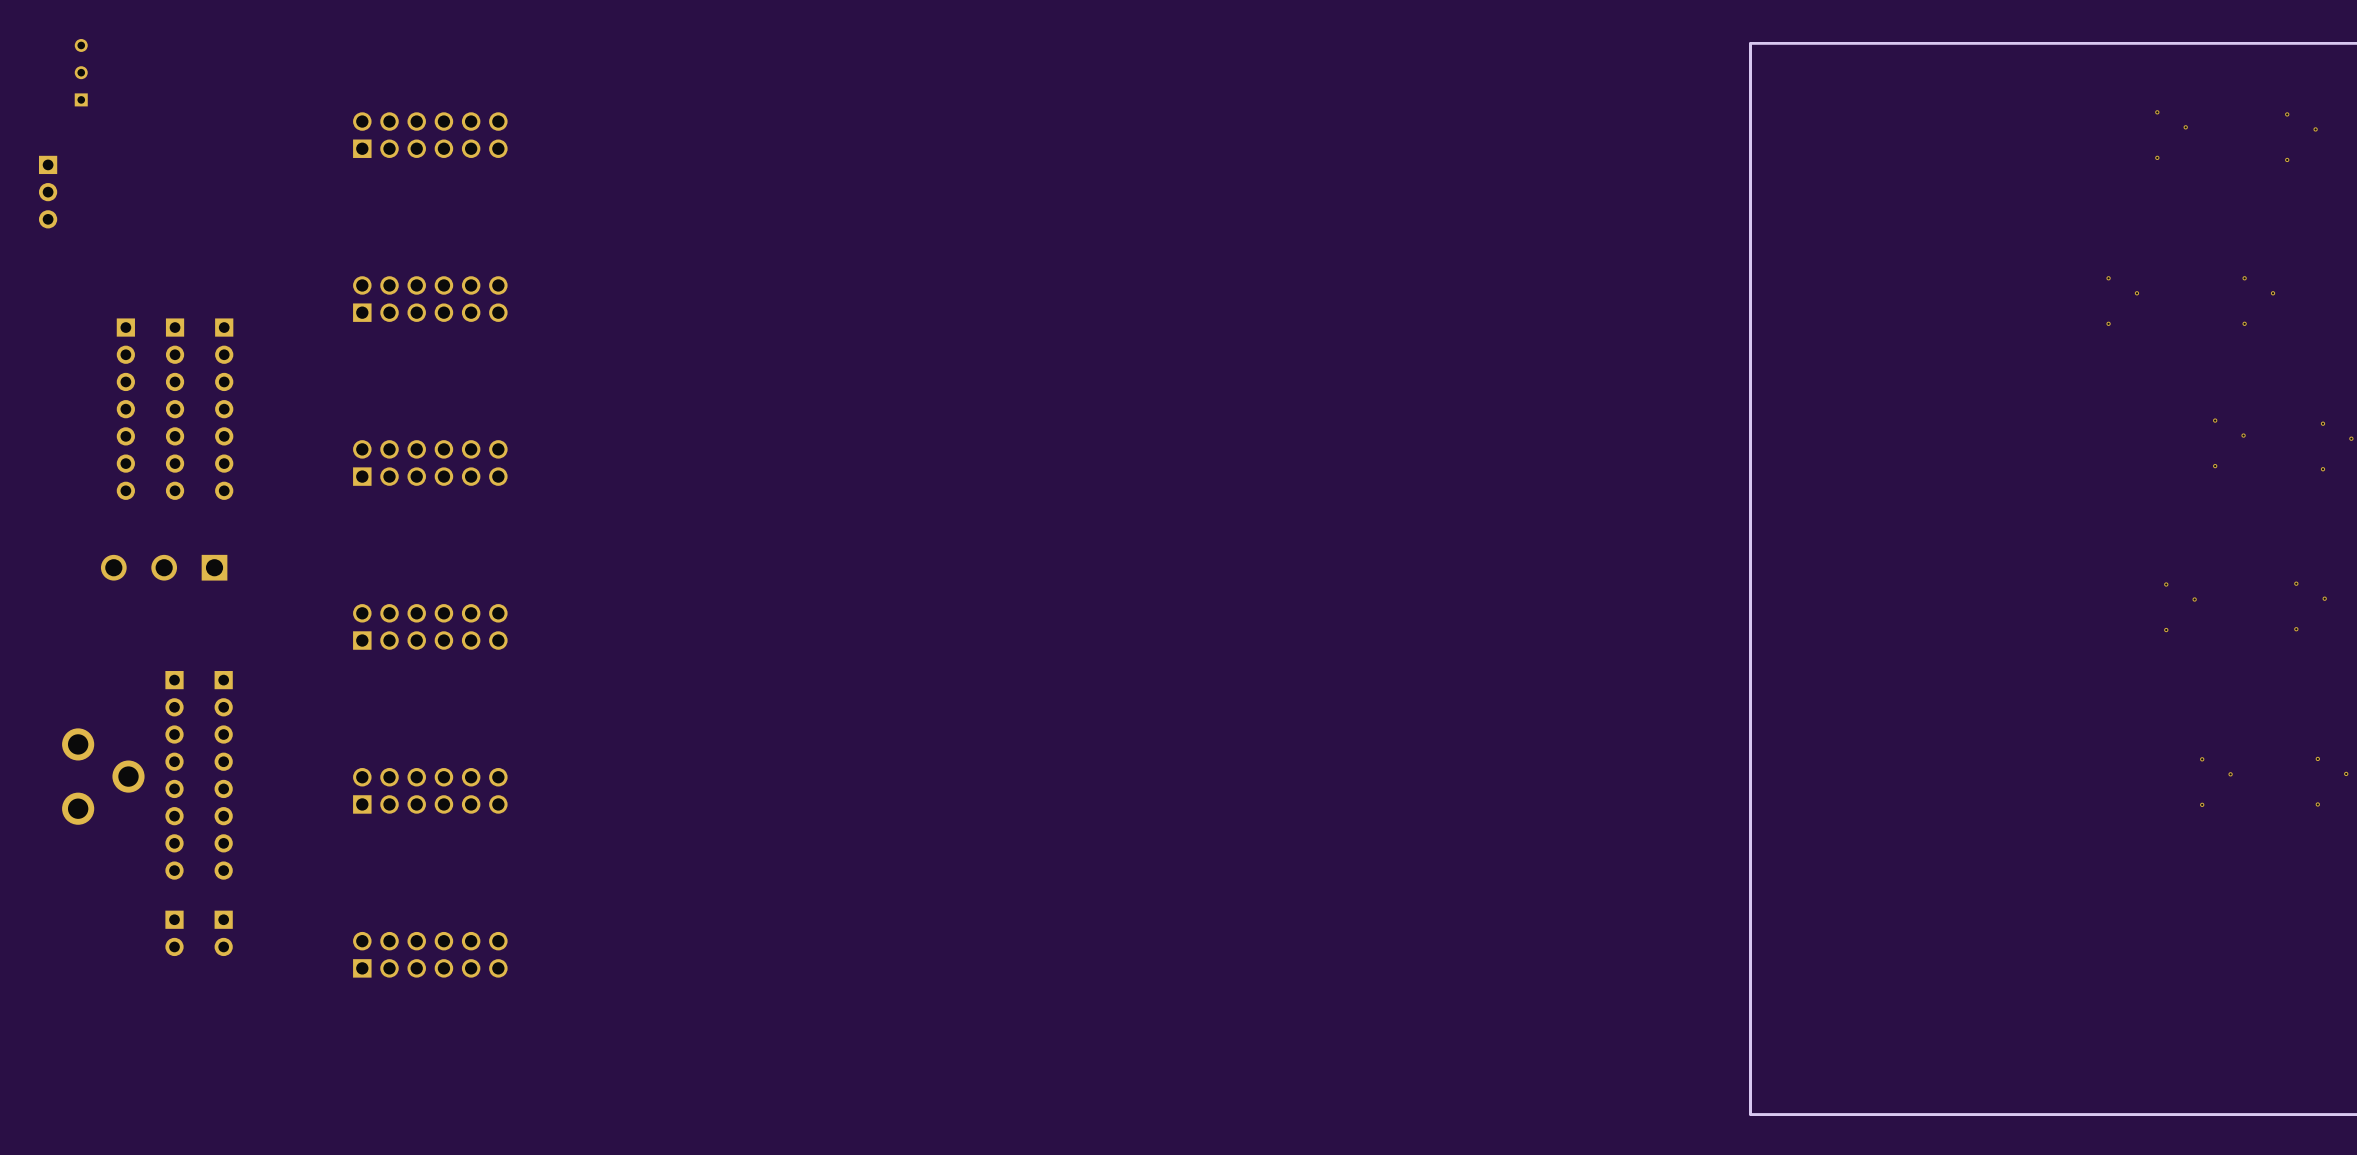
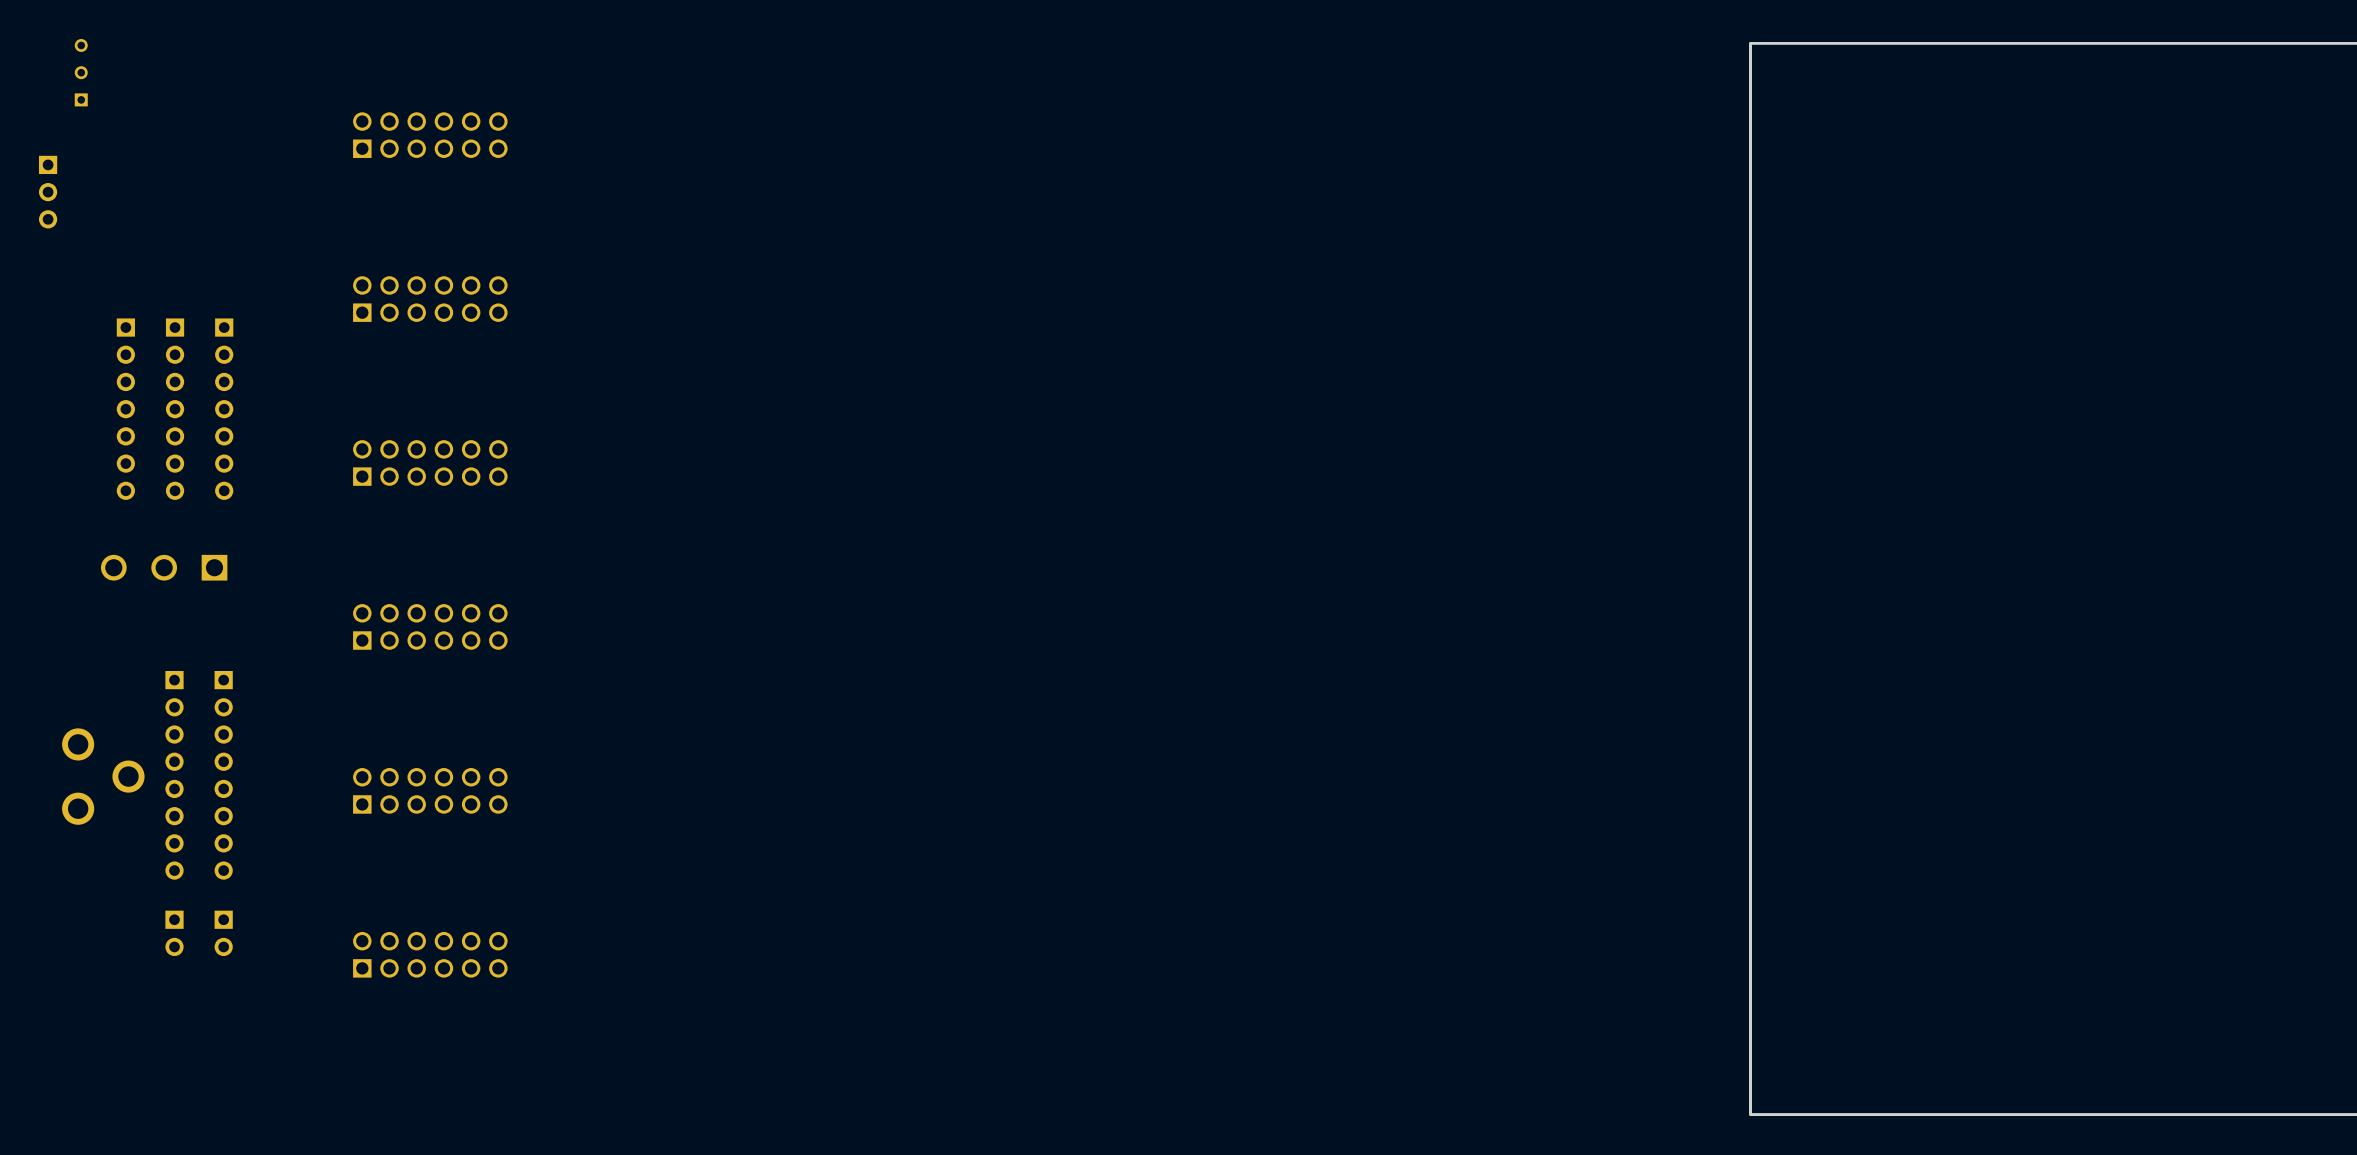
via: (2157, 112) -> none
via: (2287, 114) -> none
via: (2185, 127) -> none
via: (2315, 129) -> none
via: (2157, 157) -> none
via: (2287, 159) -> none
via: (2108, 278) -> none
via: (2244, 278) -> none
via: (2136, 293) -> none
via: (2273, 293) -> none
via: (2108, 323) -> none
via: (2244, 323) -> none
via: (2215, 420) -> none
via: (2322, 423) -> none
via: (2243, 435) -> none
via: (2351, 438) -> none
via: (2215, 466) -> none
via: (2322, 469) -> none
via: (2296, 583) -> none
via: (2166, 584) -> none
via: (2324, 598) -> none
via: (2194, 599) -> none
via: (2296, 629) -> none
via: (2166, 630) -> none
via: (2317, 758) -> none
via: (2202, 759) -> none
via: (2346, 773) -> none
via: (2230, 774) -> none
via: (2202, 804) -> none
via: (2317, 804) -> none

